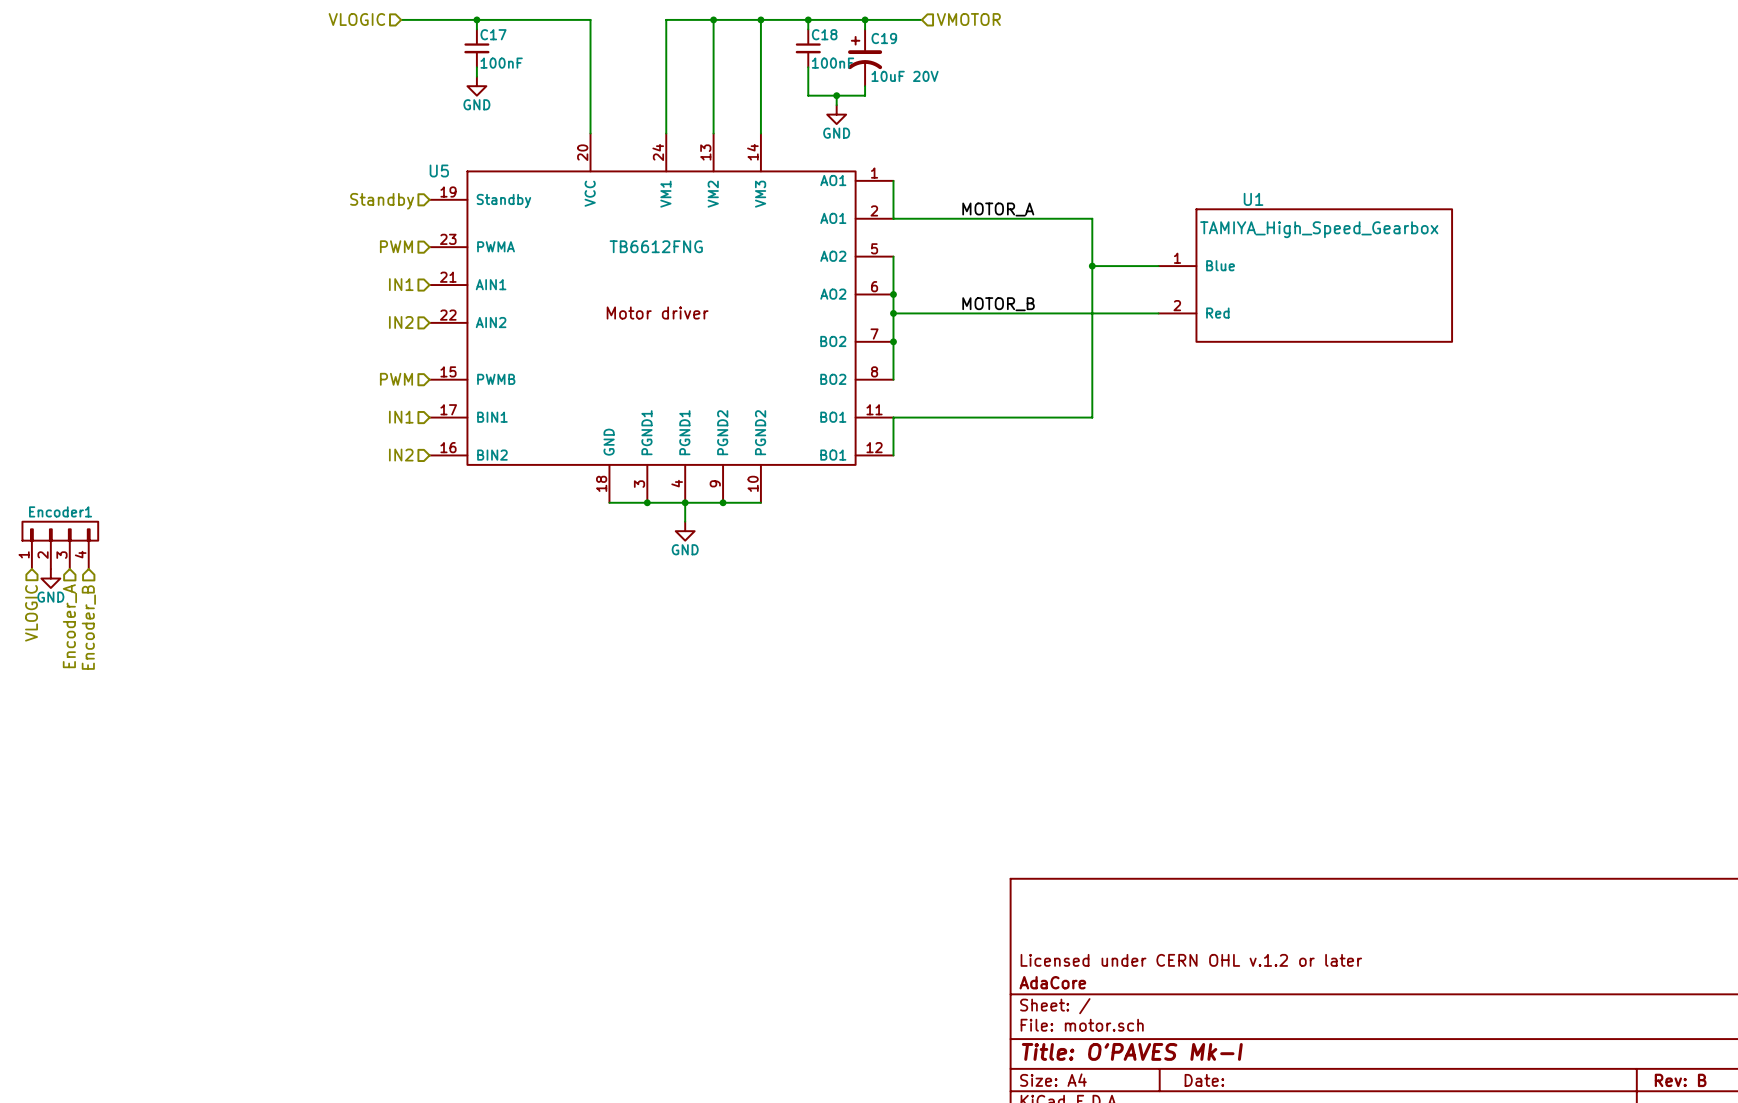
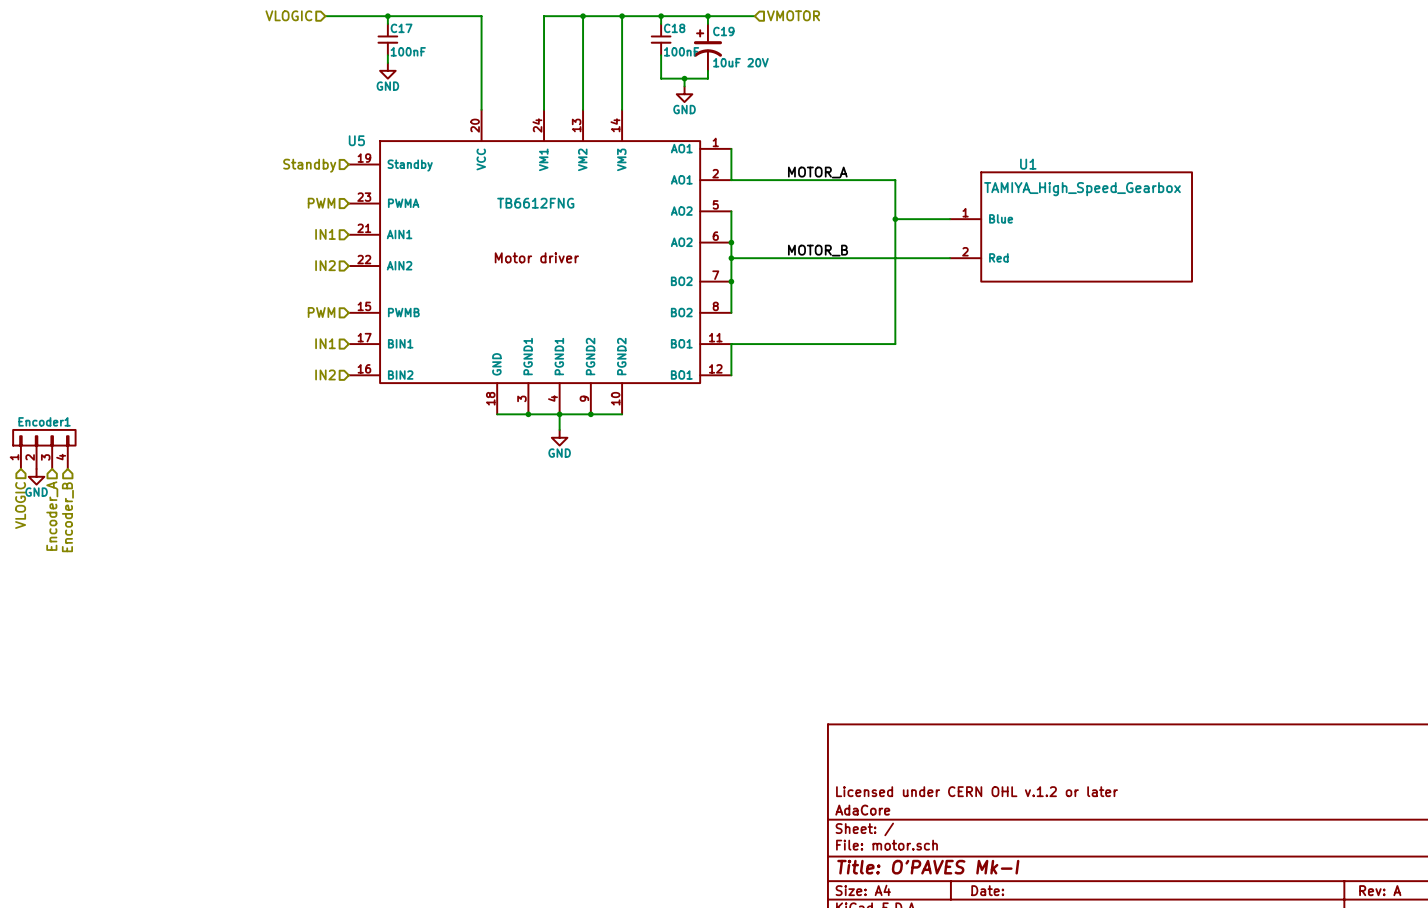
title block: Rev: B (1680, 1080) -> Rev: A (1380, 890)

